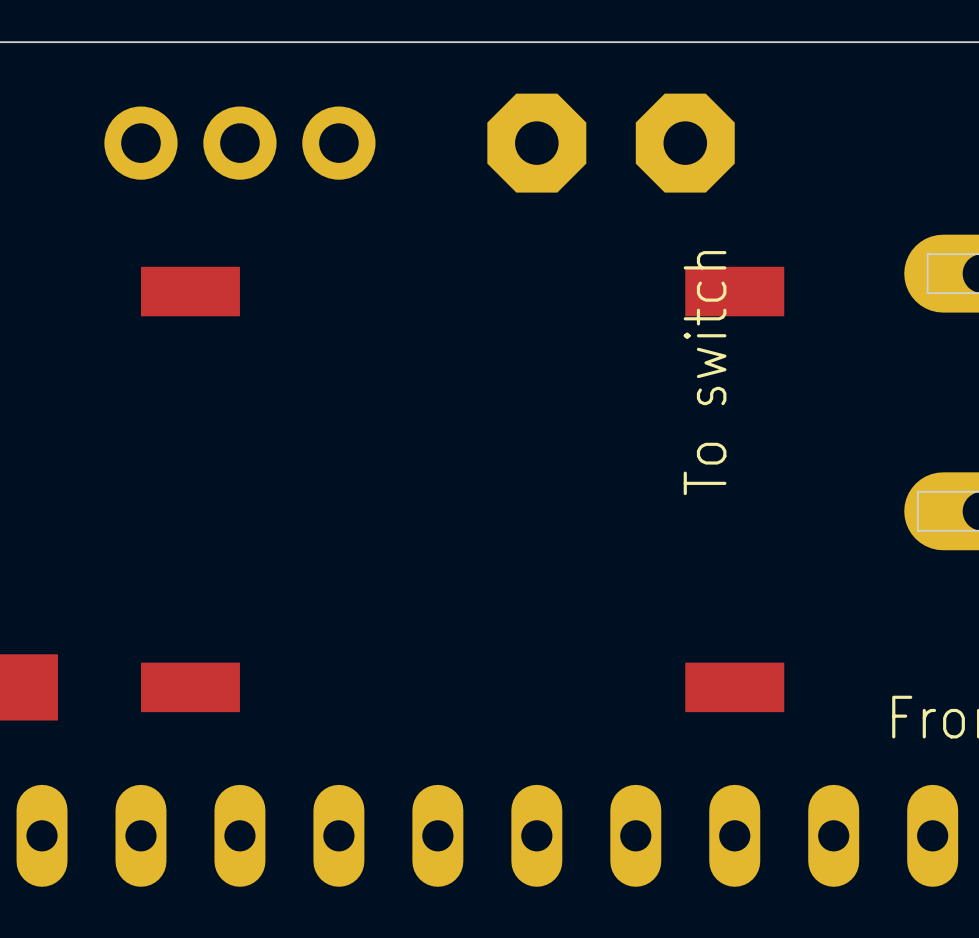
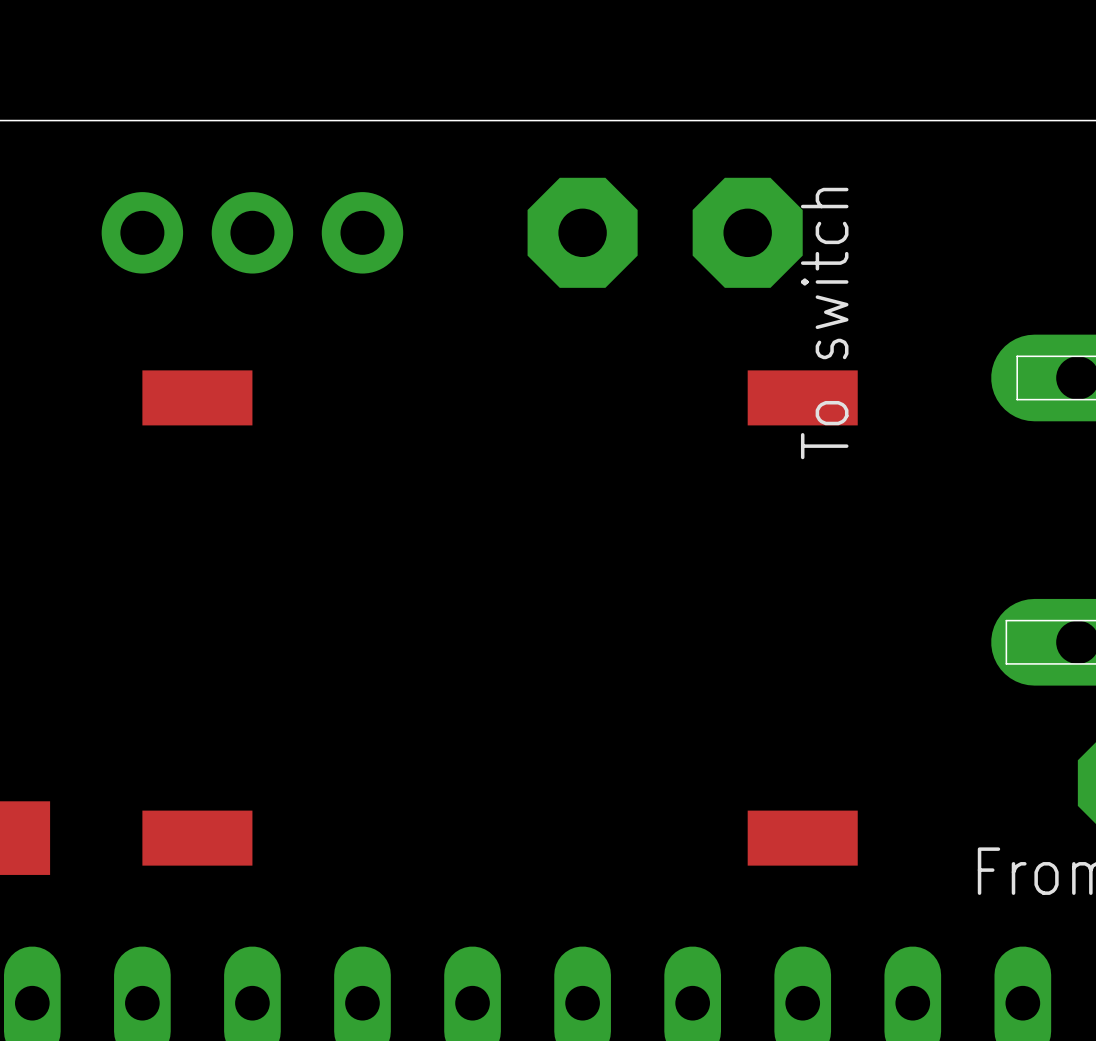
text position: To switch (705, 373) -> To switch (824, 323)

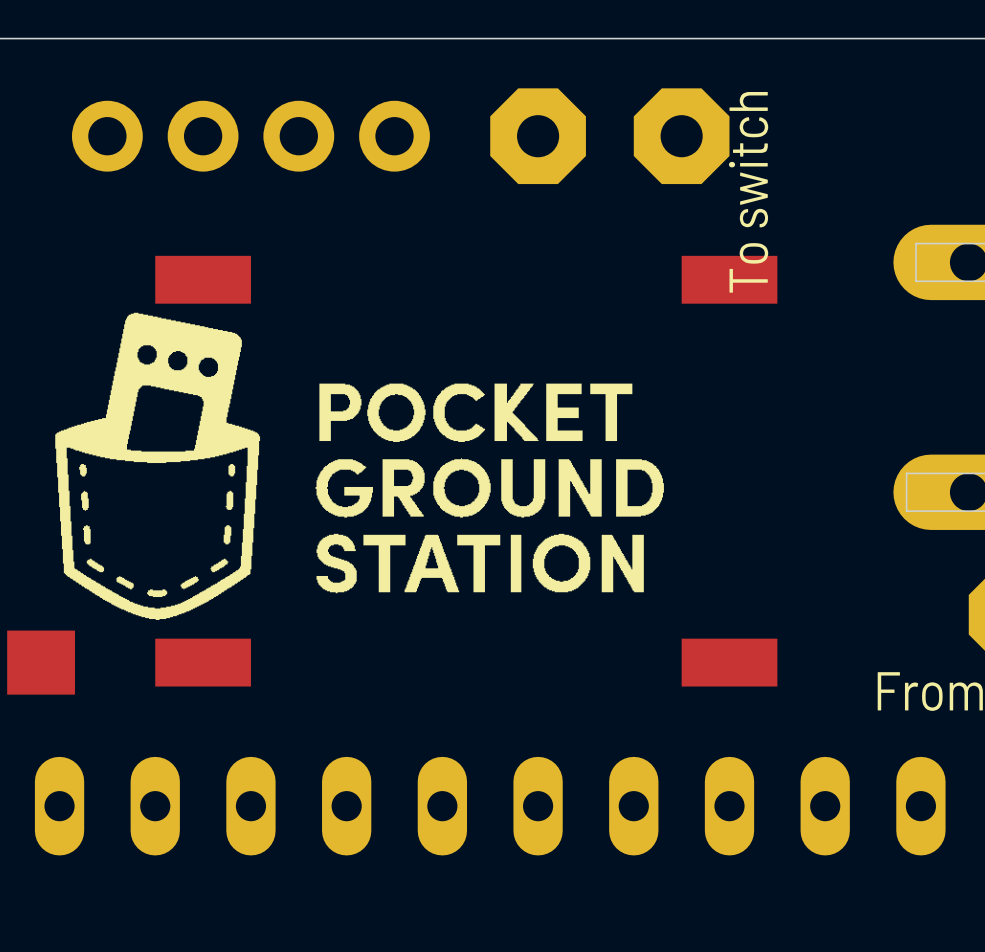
part footprint: [101, 192, 404, 274] -> [71, 100, 430, 172]
drawing: none -> [55, 312, 261, 621]
drawing: none -> [315, 383, 664, 594]

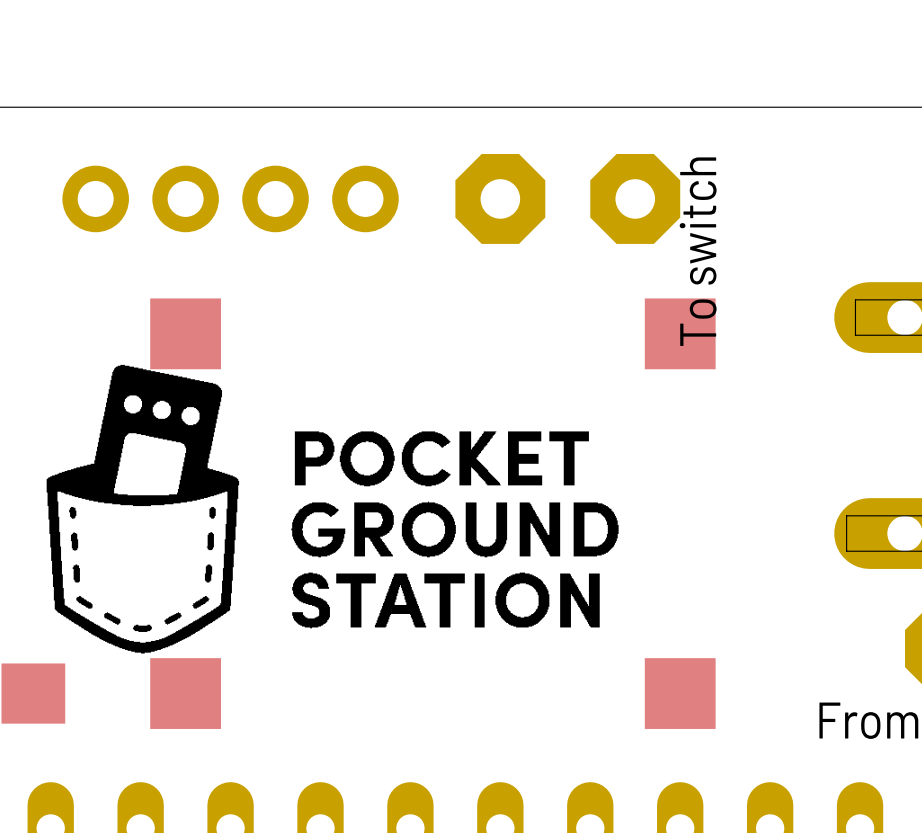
part footprint: [155, 255, 251, 304] -> [150, 298, 222, 370]
part footprint: [681, 255, 778, 304] -> [644, 298, 716, 370]
part footprint: [155, 638, 251, 687] -> [150, 658, 222, 729]
part footprint: [681, 638, 778, 687] -> [644, 658, 716, 729]

